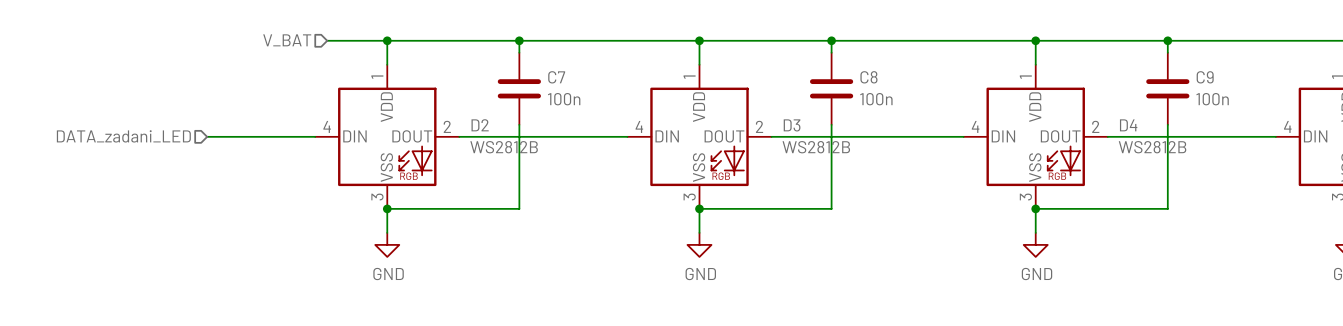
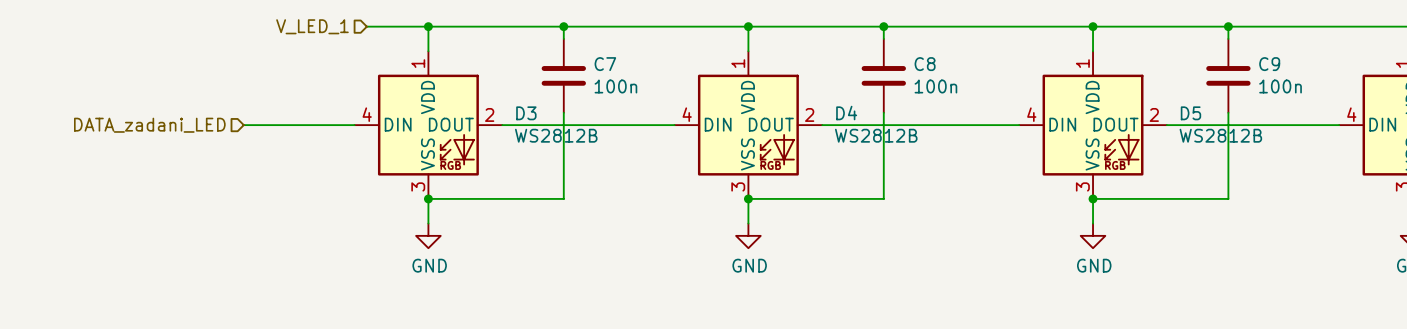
hierarchical label: V_BAT (287, 40) -> V_LED_1 (312, 26)
D2 name: D2 (480, 125) -> D3 (526, 113)
D3 name: D3 (792, 125) -> D4 (846, 113)
D4 name: D4 (1128, 125) -> D5 (1190, 113)

